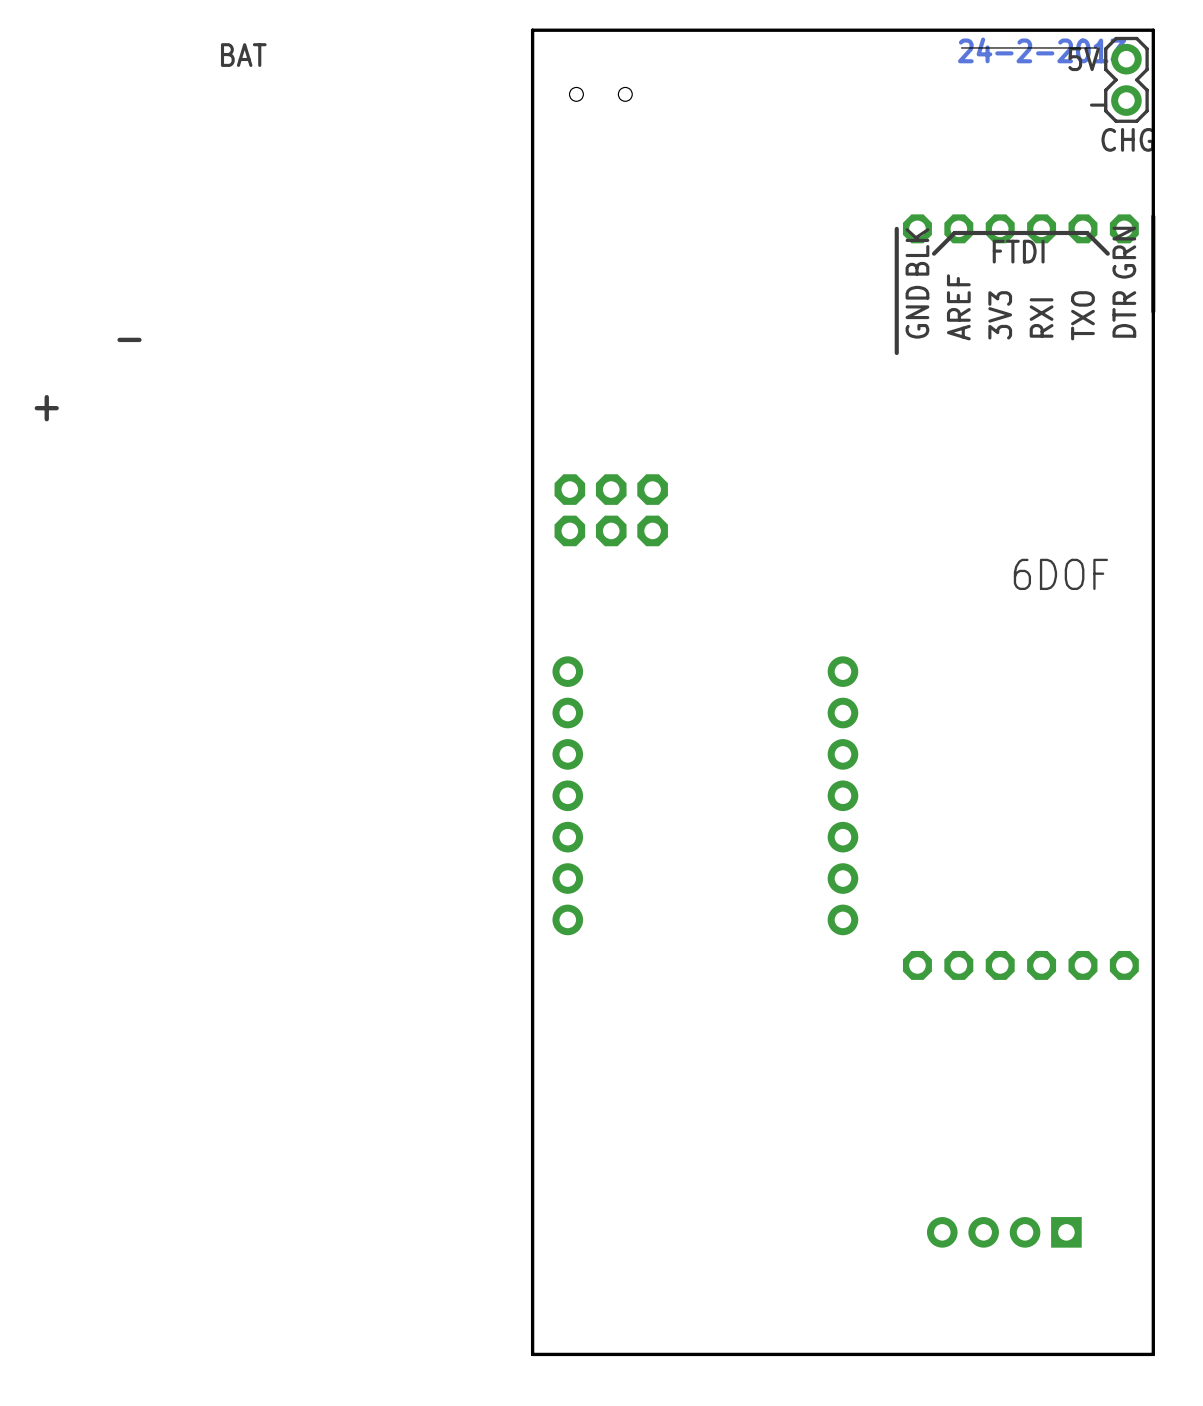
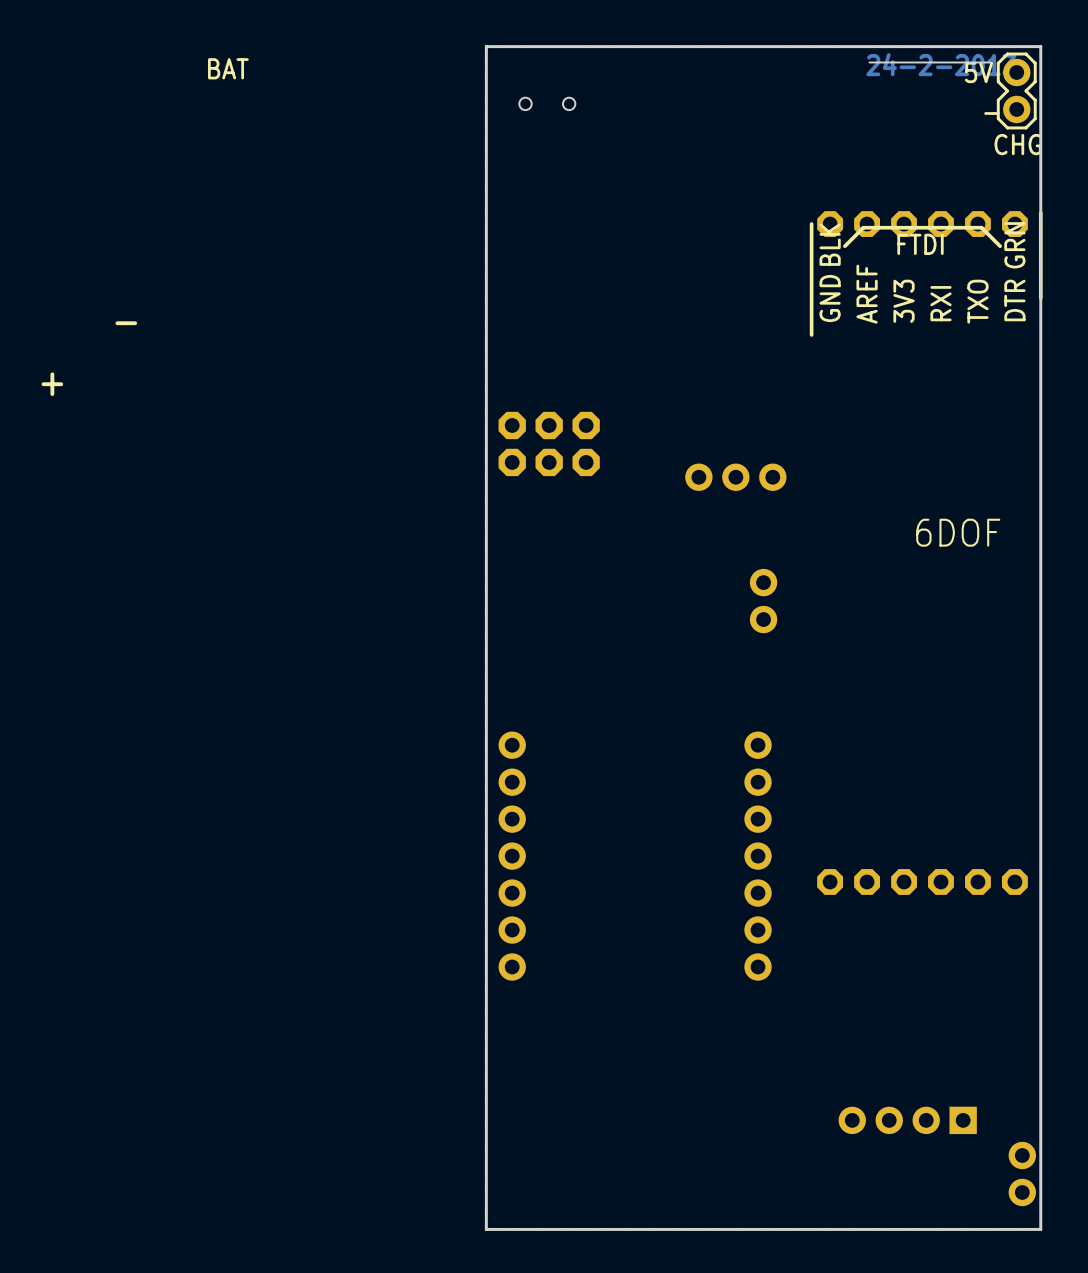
part position: (611, 510) -> (549, 443)
part: none -> (735, 477)
part: none -> (763, 601)
part position: (567, 795) -> (512, 856)
part position: (842, 795) -> (758, 856)
part: none -> (1022, 1173)

